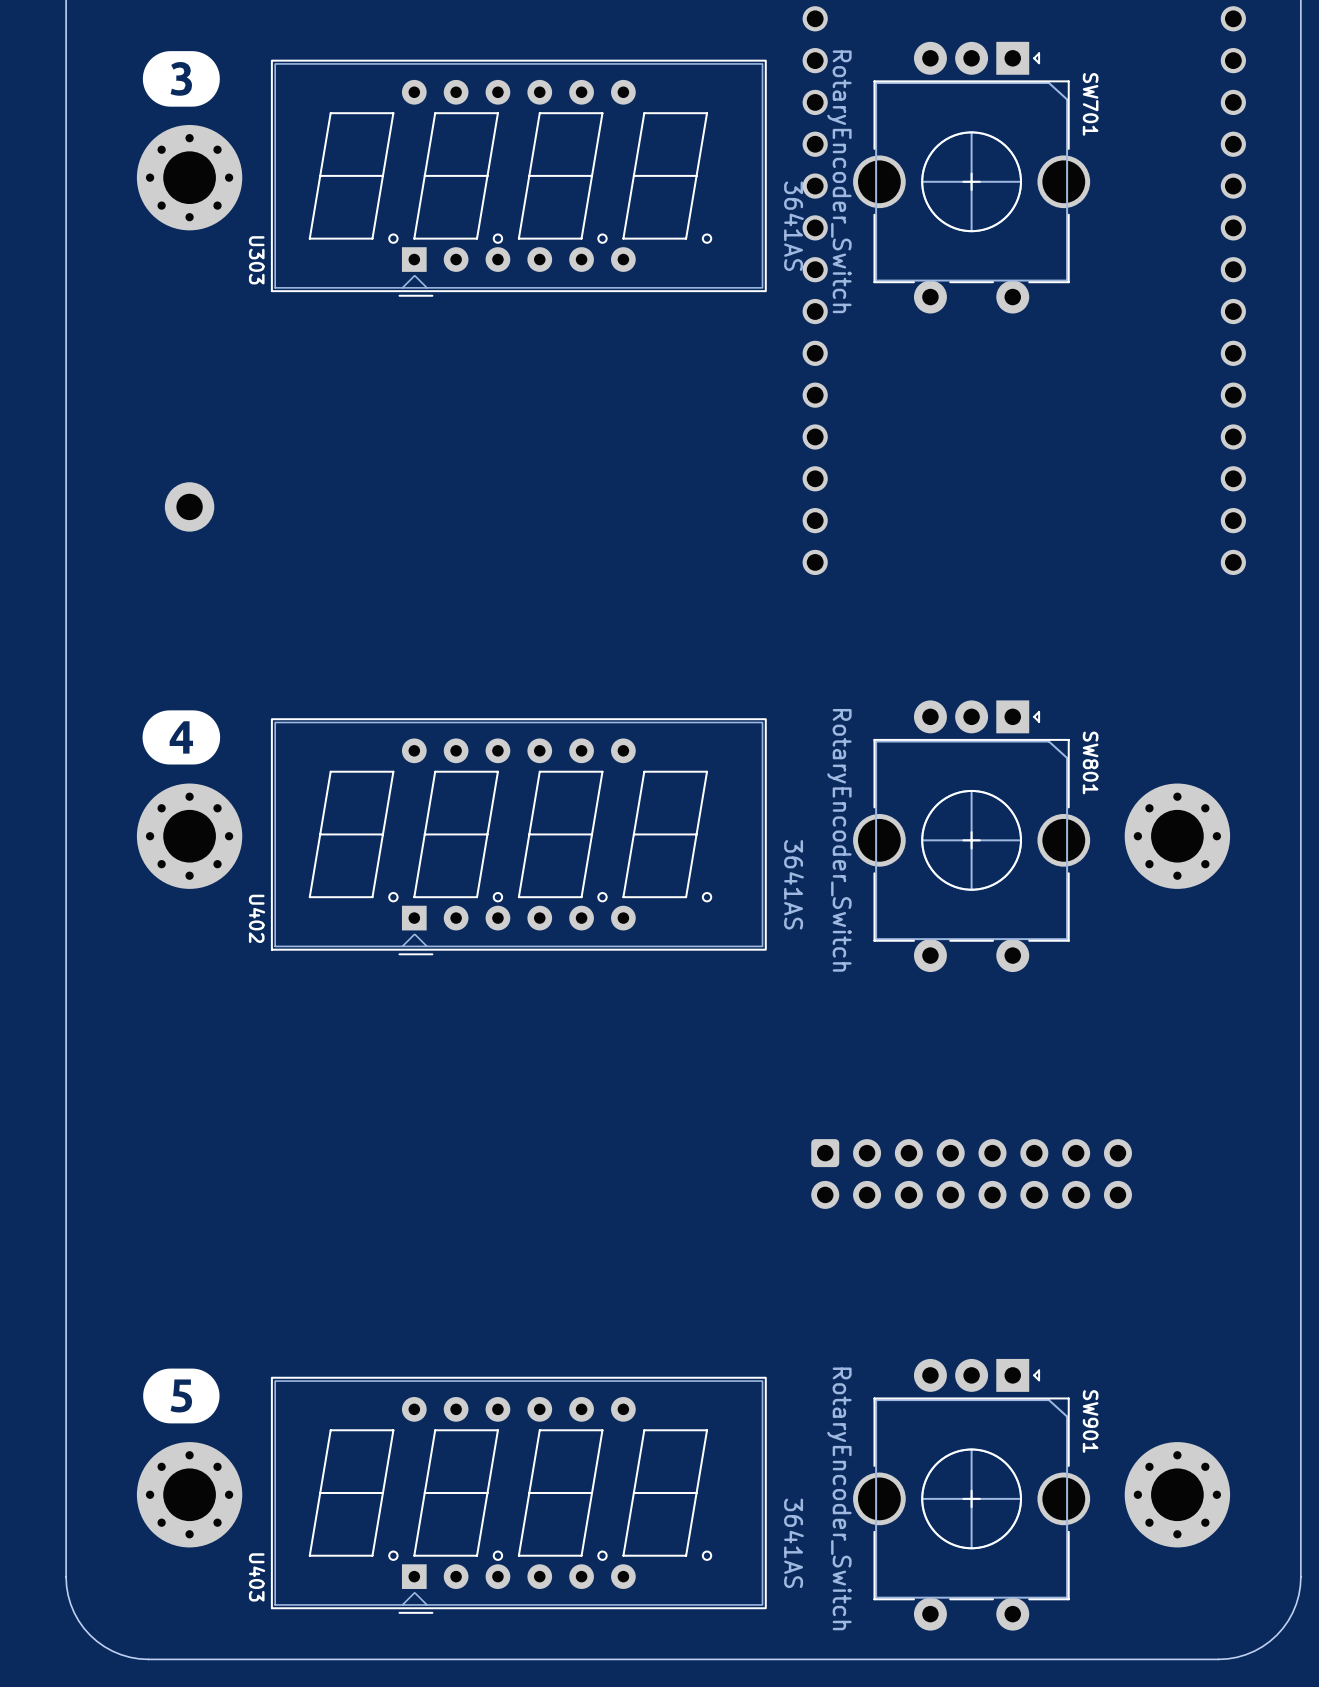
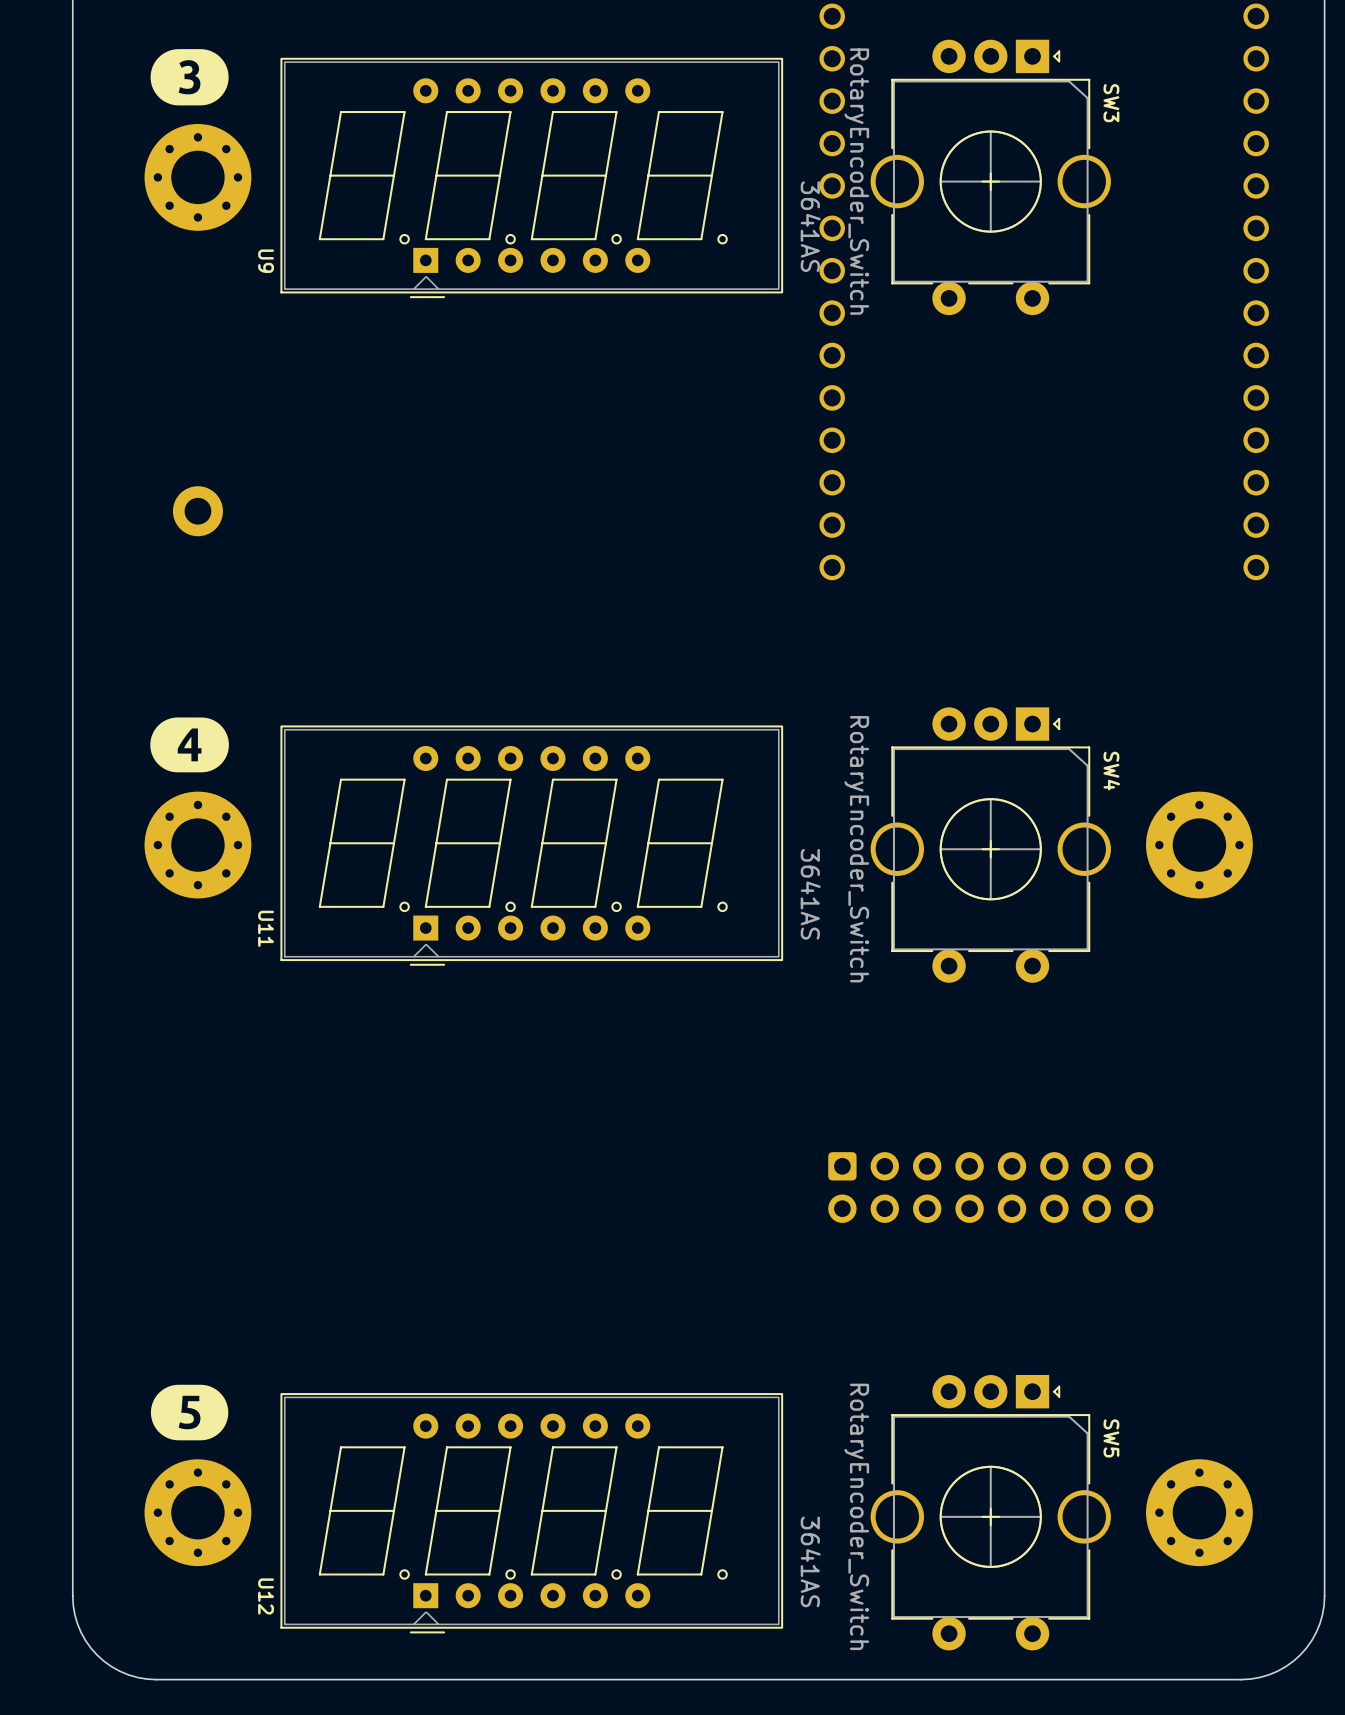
SW701 name: SW701 (1090, 104) -> SW3 (1111, 103)
U303 name: U303 (256, 260) -> U9 (266, 261)
SW801 name: SW801 (1090, 762) -> SW4 (1111, 771)
U402 name: U402 (257, 918) -> U11 (266, 928)
SW901 name: SW901 (1090, 1421) -> SW5 (1111, 1438)
U403 name: U403 (257, 1577) -> U12 (266, 1596)

